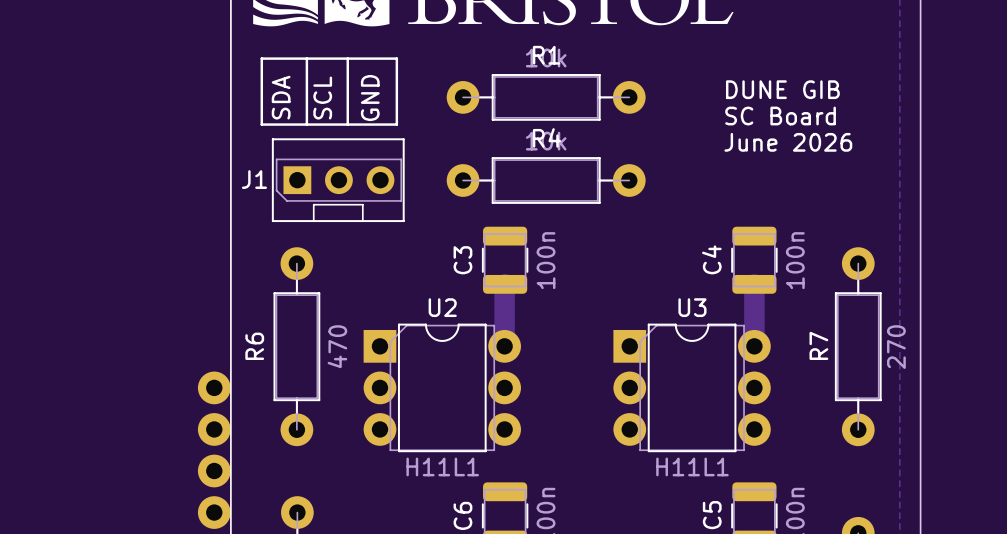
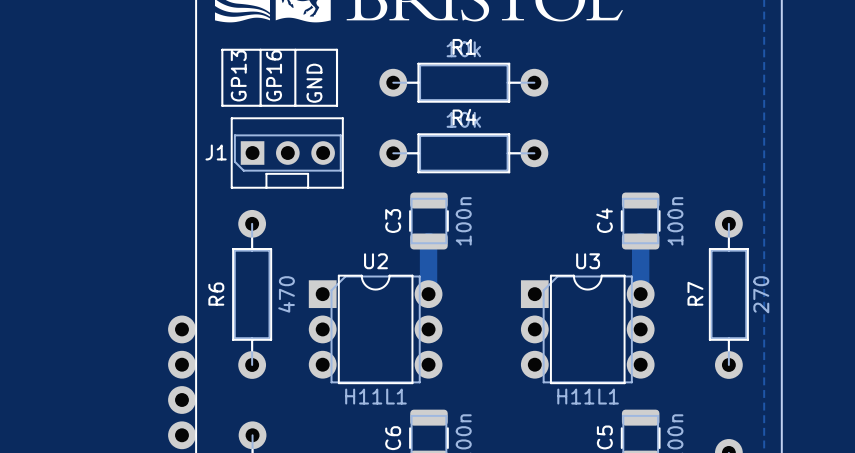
text: DUNE GIB (782, 89) -> none
text: SDA (281, 97) -> GP13 (238, 75)
text: SCL (322, 98) -> GP16 (274, 75)
text: SC Board (780, 116) -> none
text: June 2026 (788, 142) -> none

